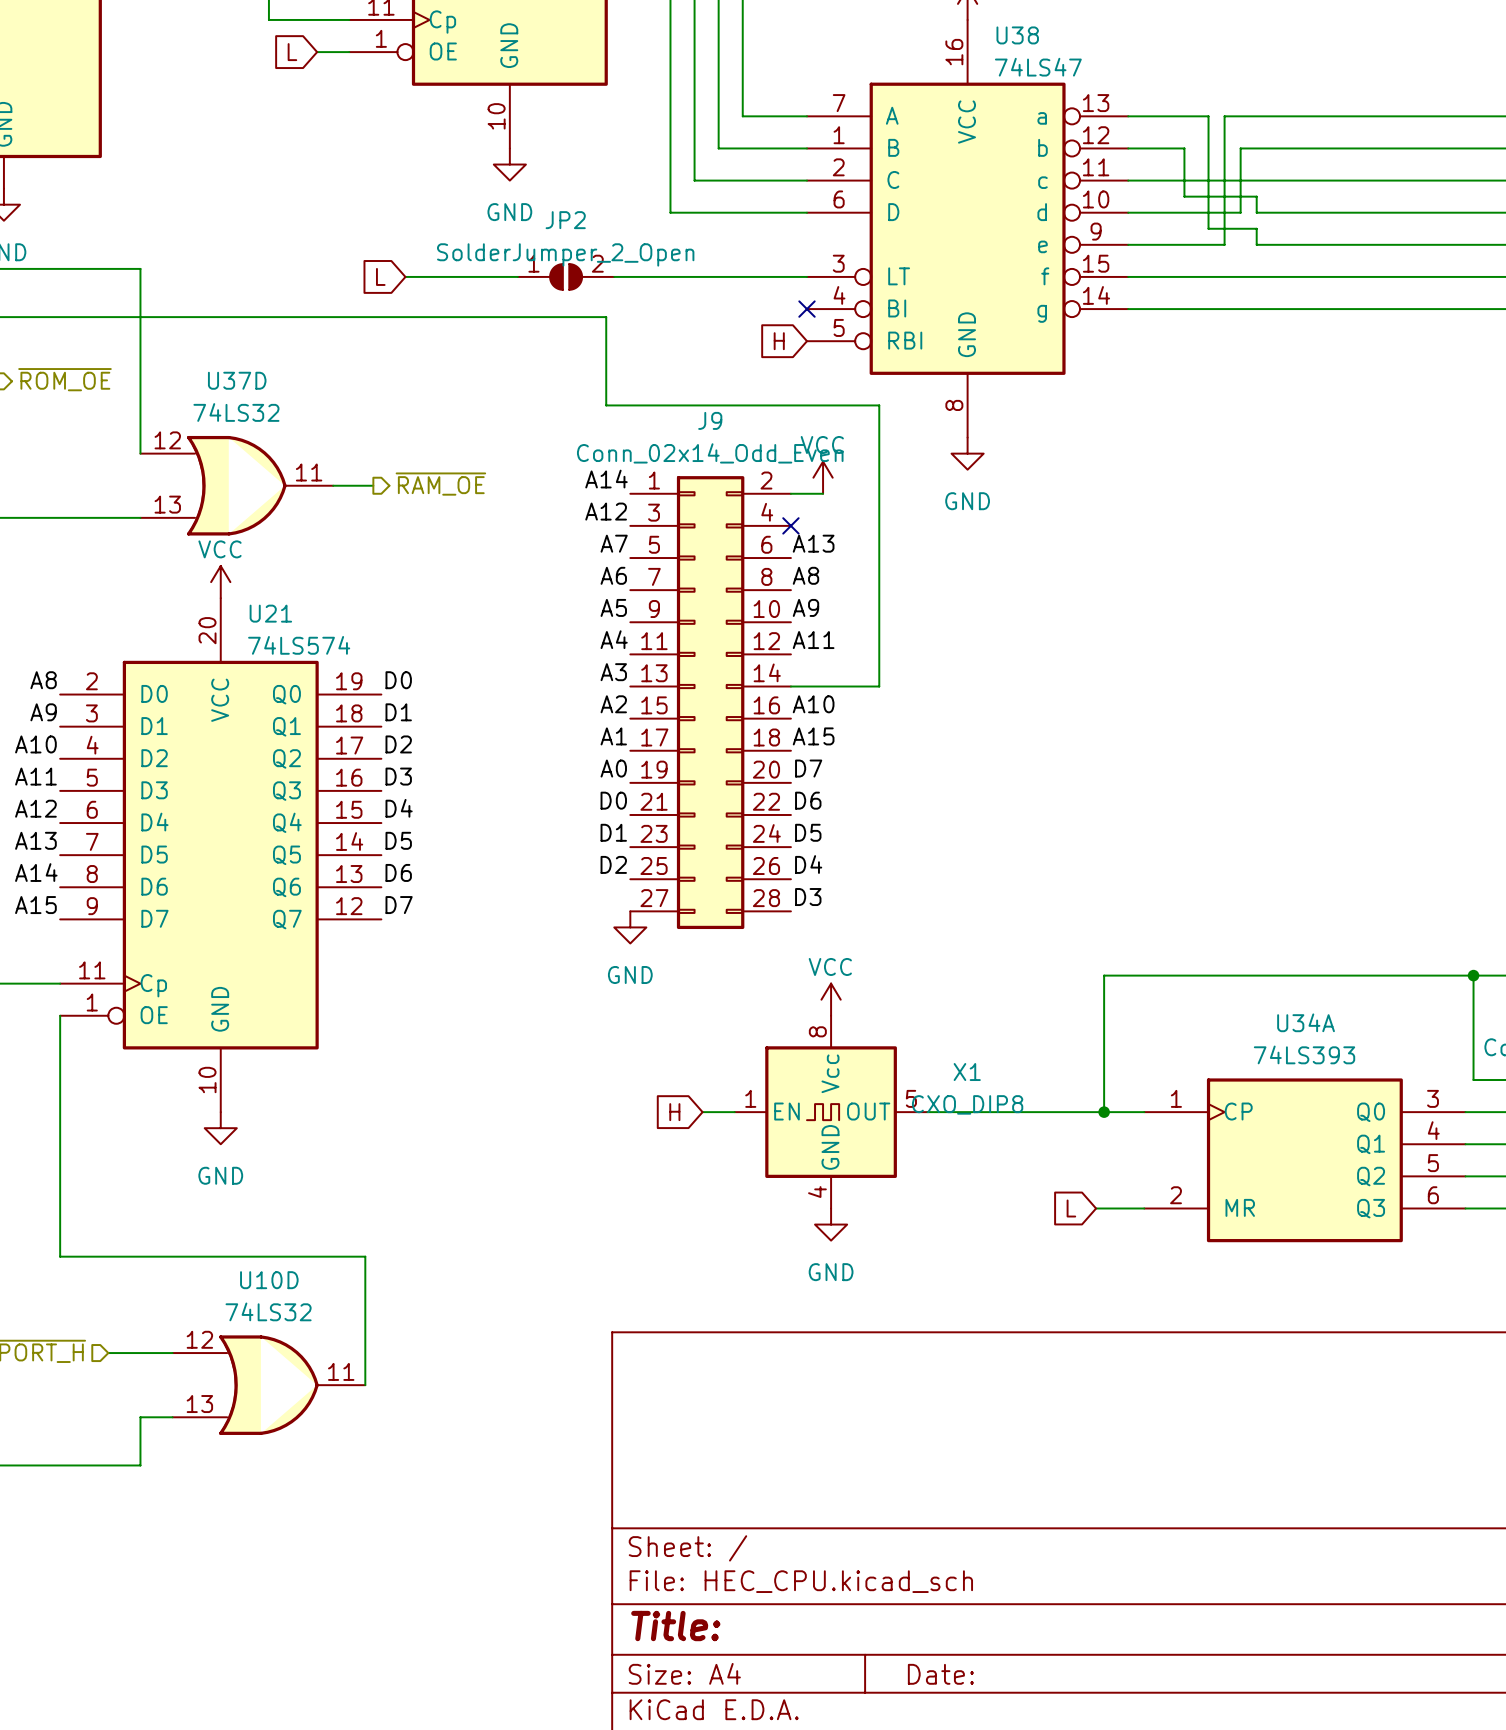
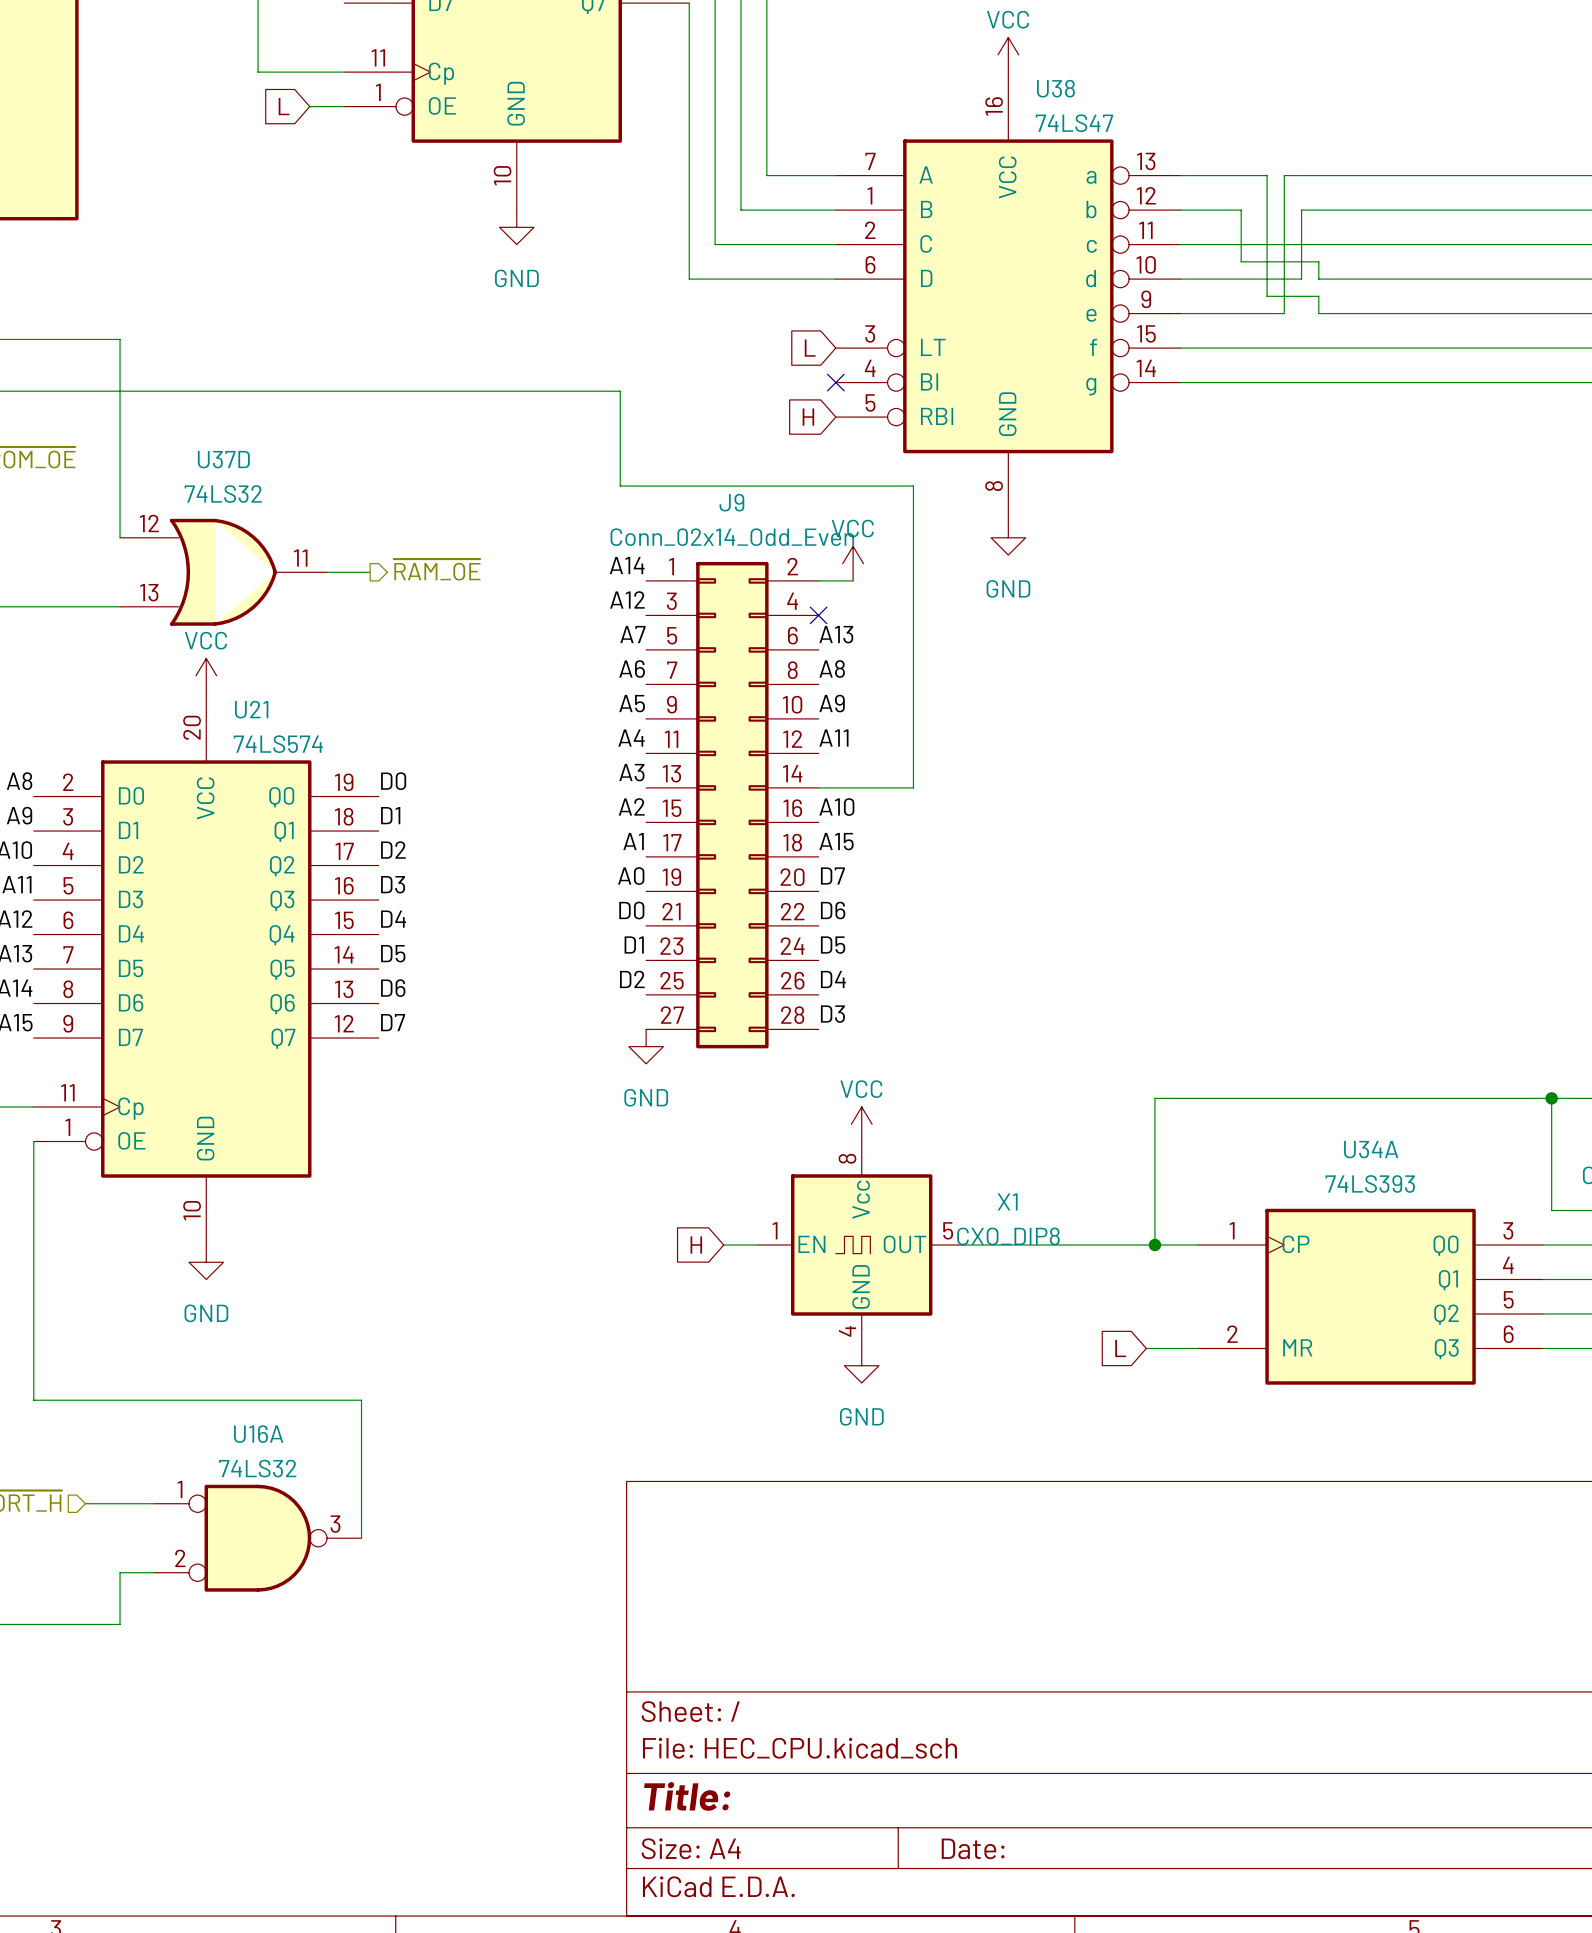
global label: L (380, 276) -> none
wire: (405, 276) (517, 276) -> none
JP2: SolderJumper_2_Open (566, 276) -> none
wire: (614, 276) (806, 276) -> none
global label: none -> L (810, 348)
U10D: 74LS32 (268, 1385) -> none
U16A: none -> 74LS32 (258, 1538)

